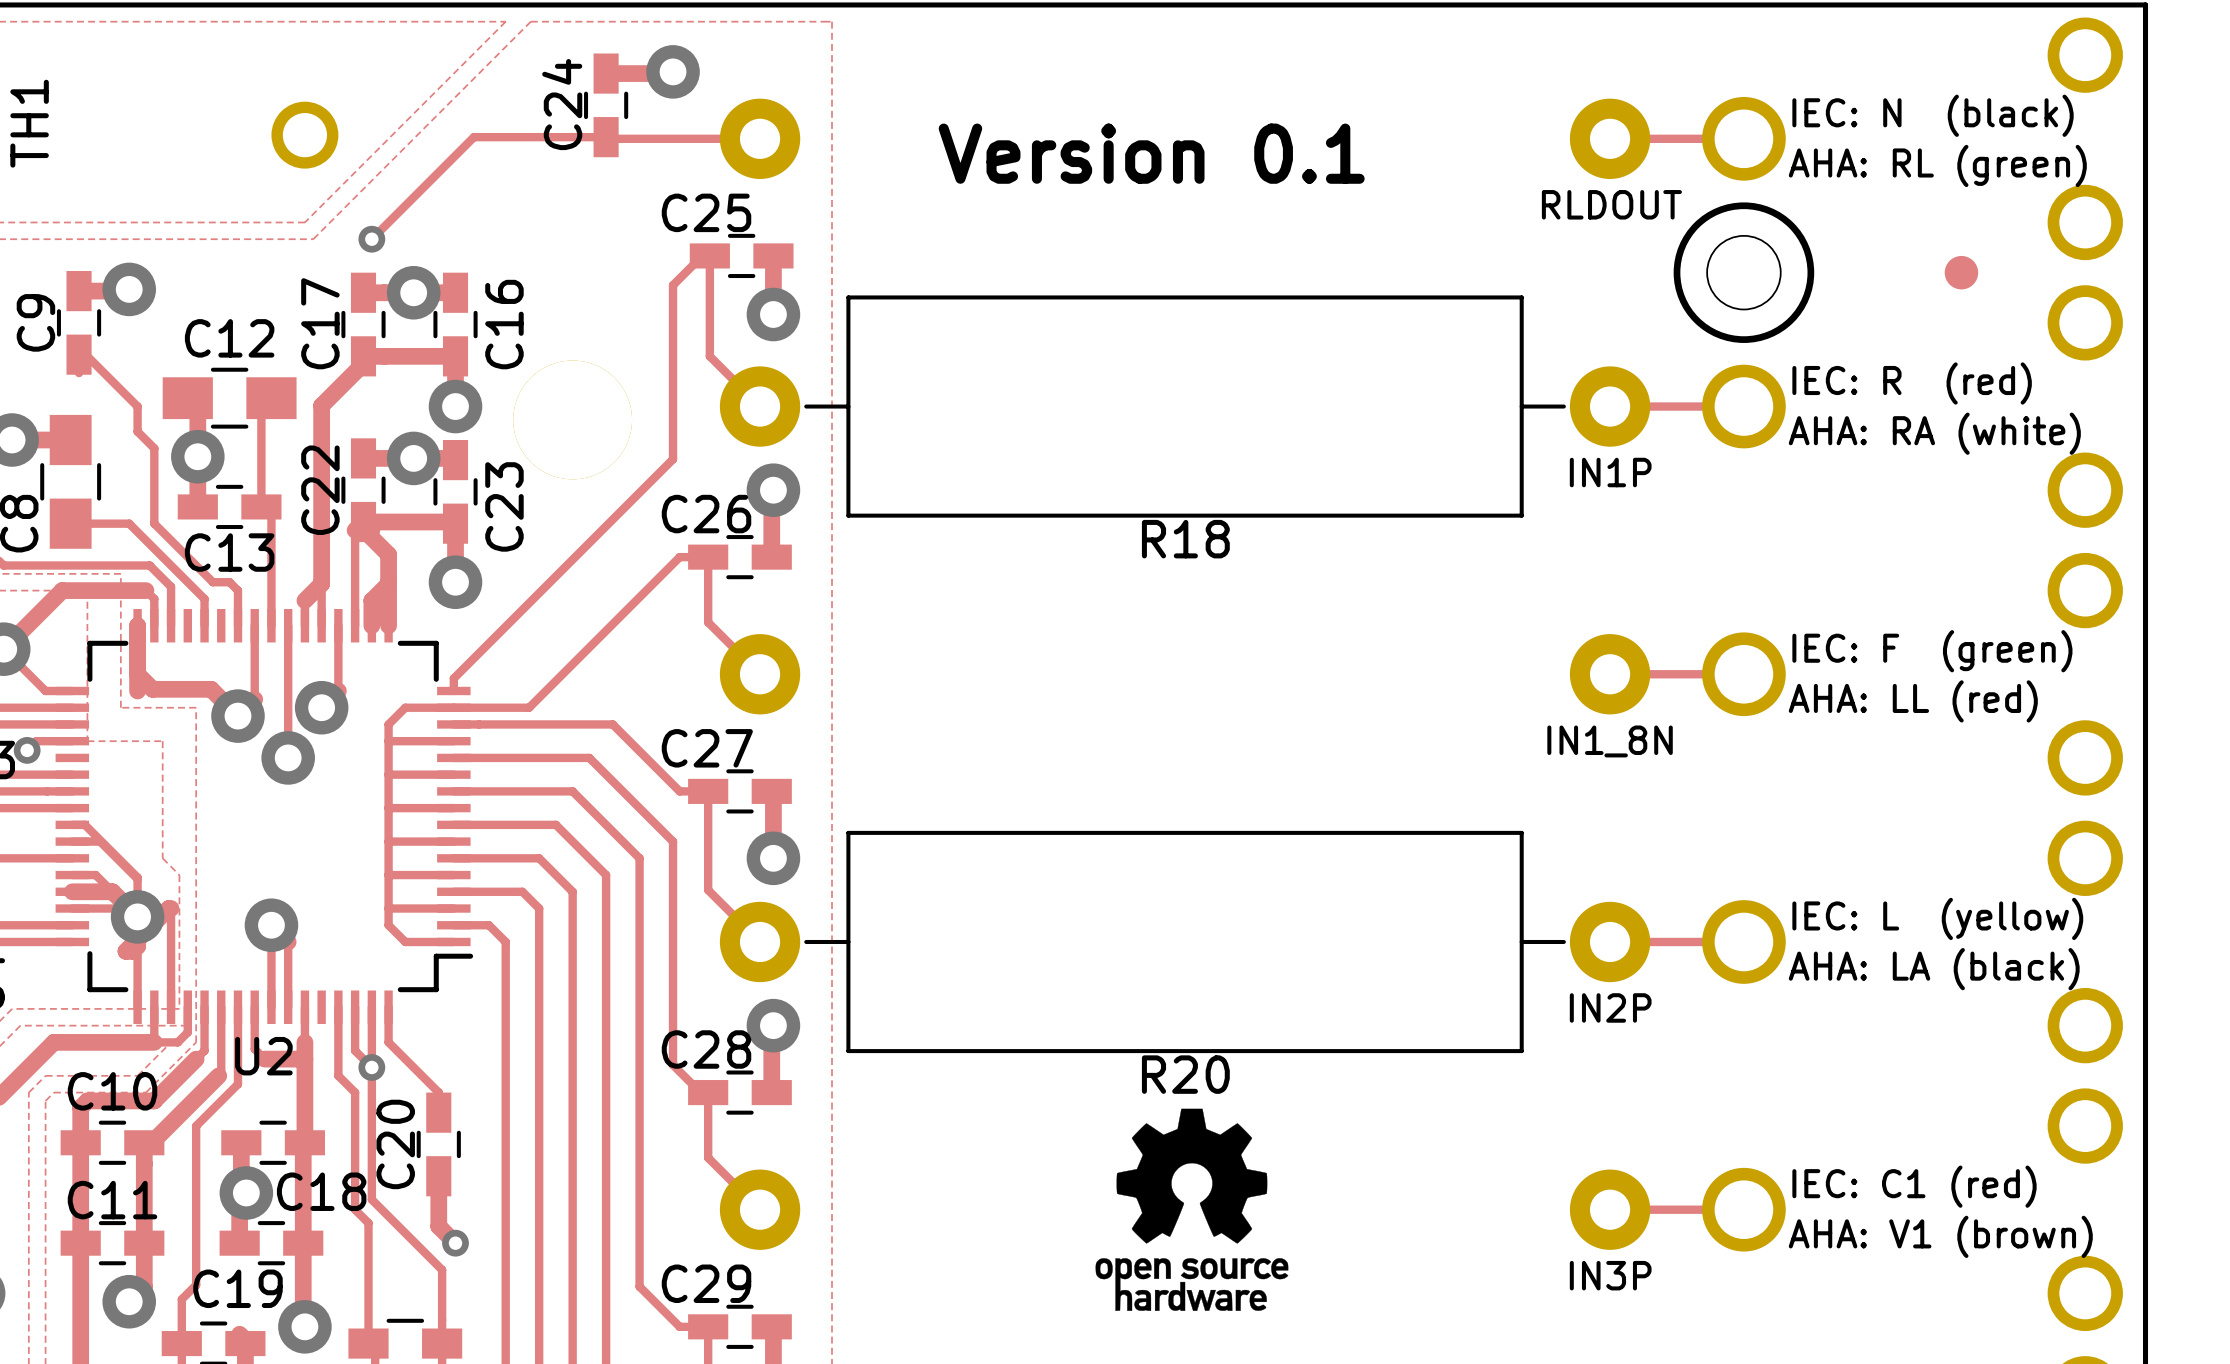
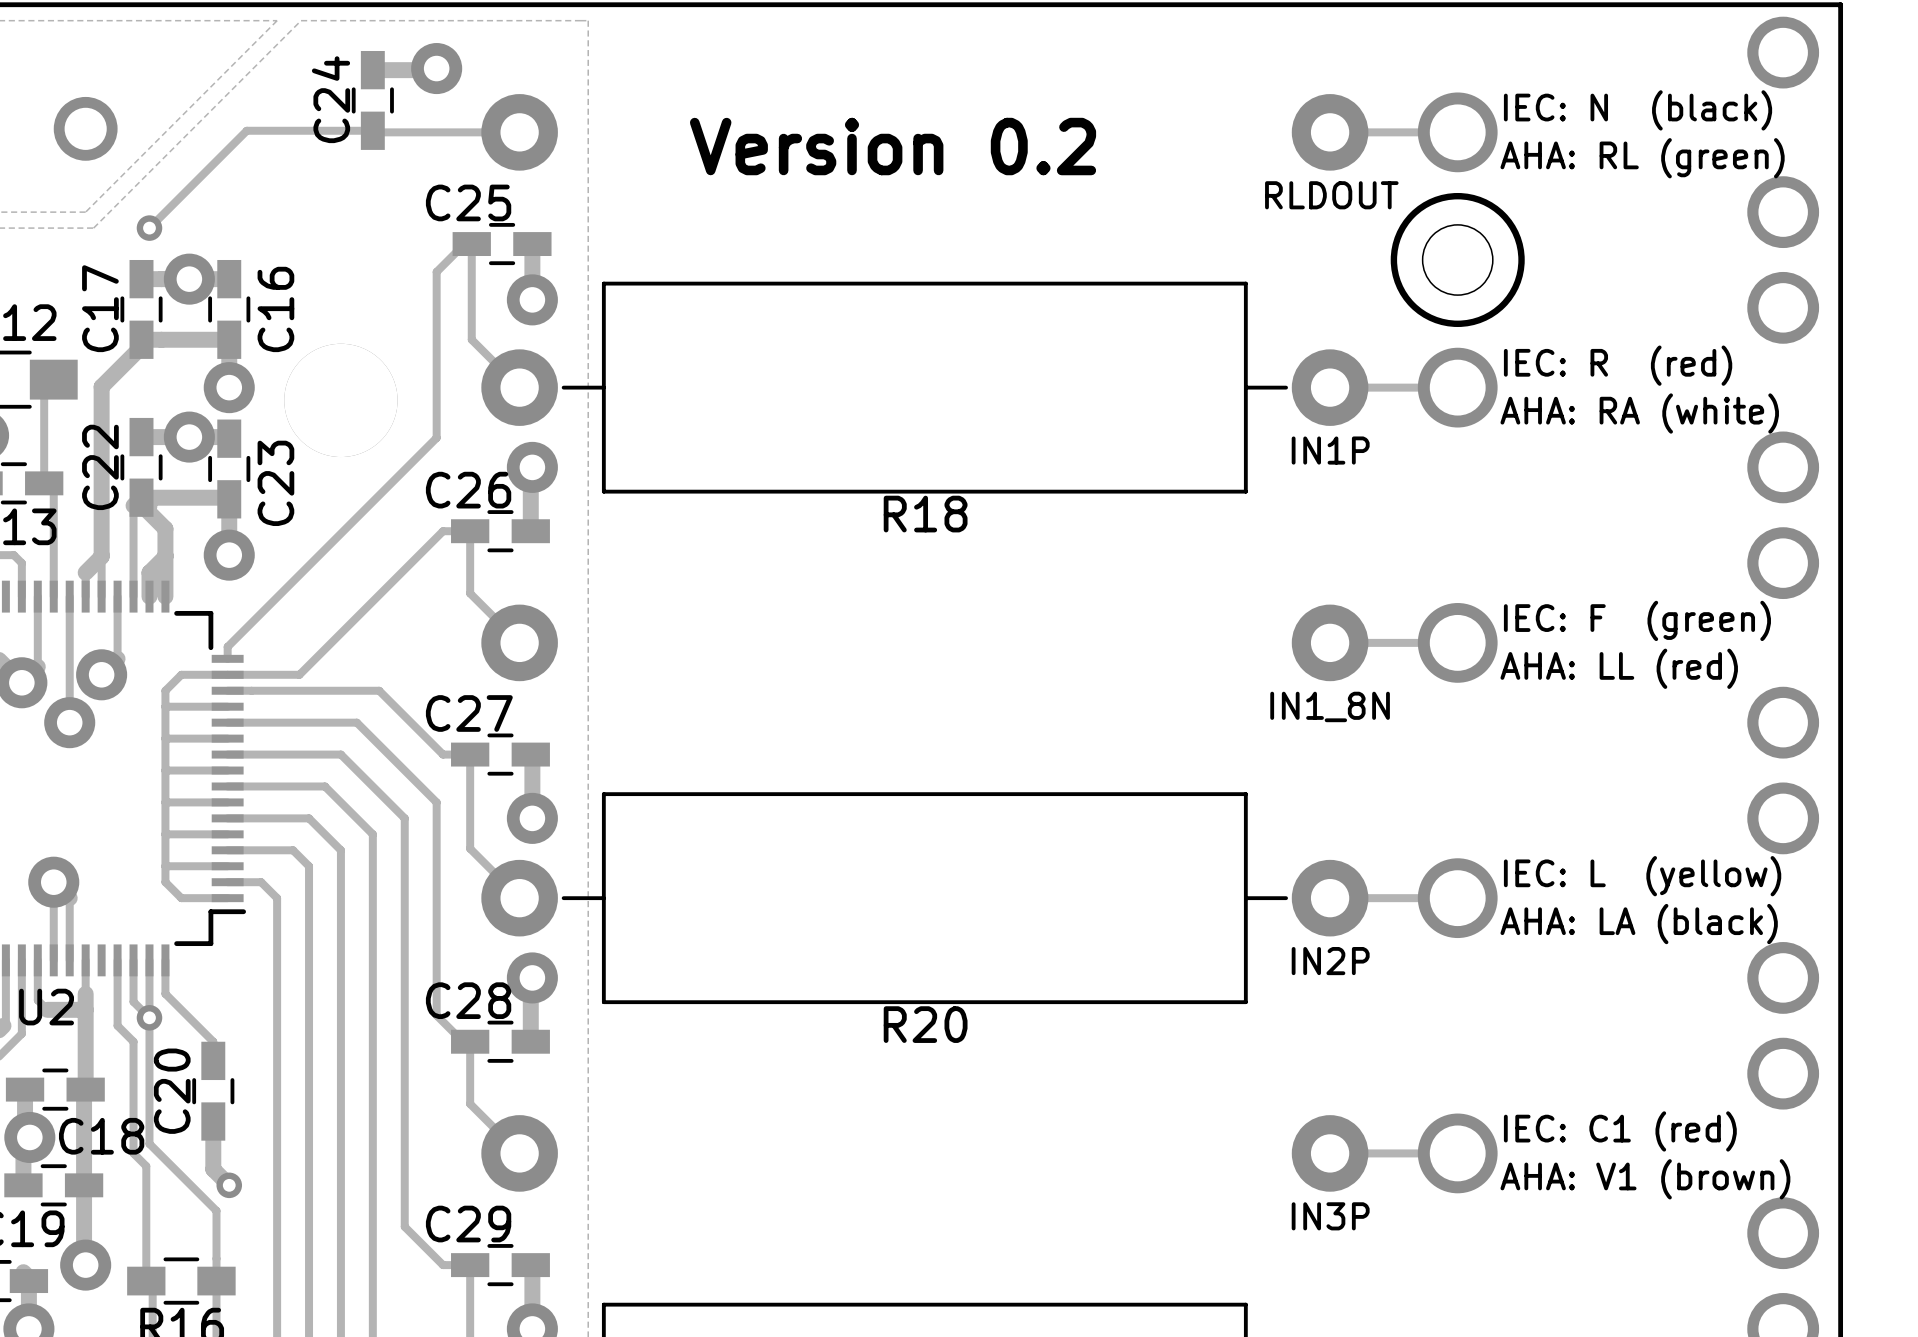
text: Version 0.1 (1151, 153) -> Version 0.2 (893, 146)
part: (1961, 272) -> none
drawing: [1095, 1108, 1289, 1311] -> none

